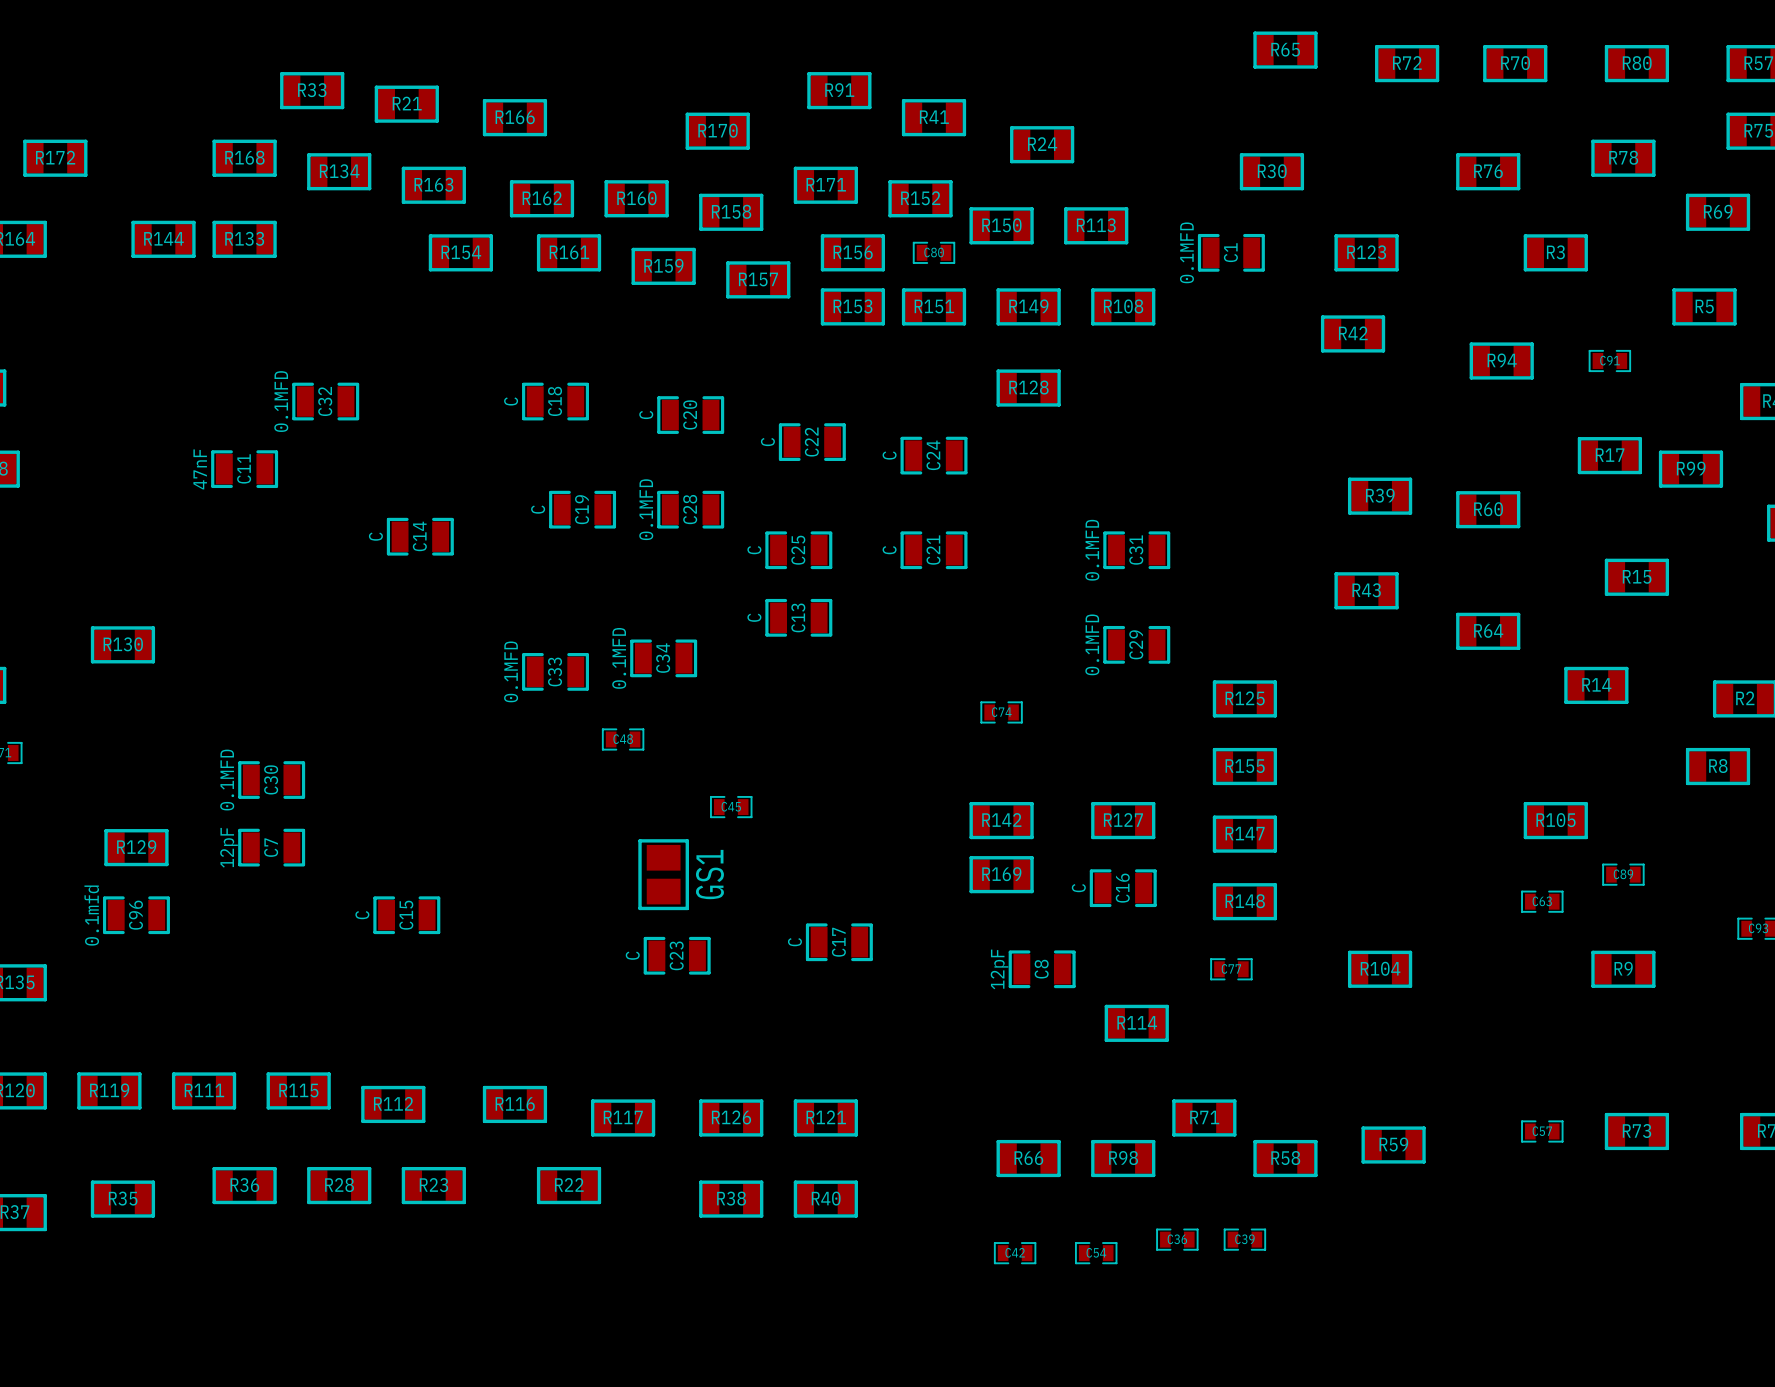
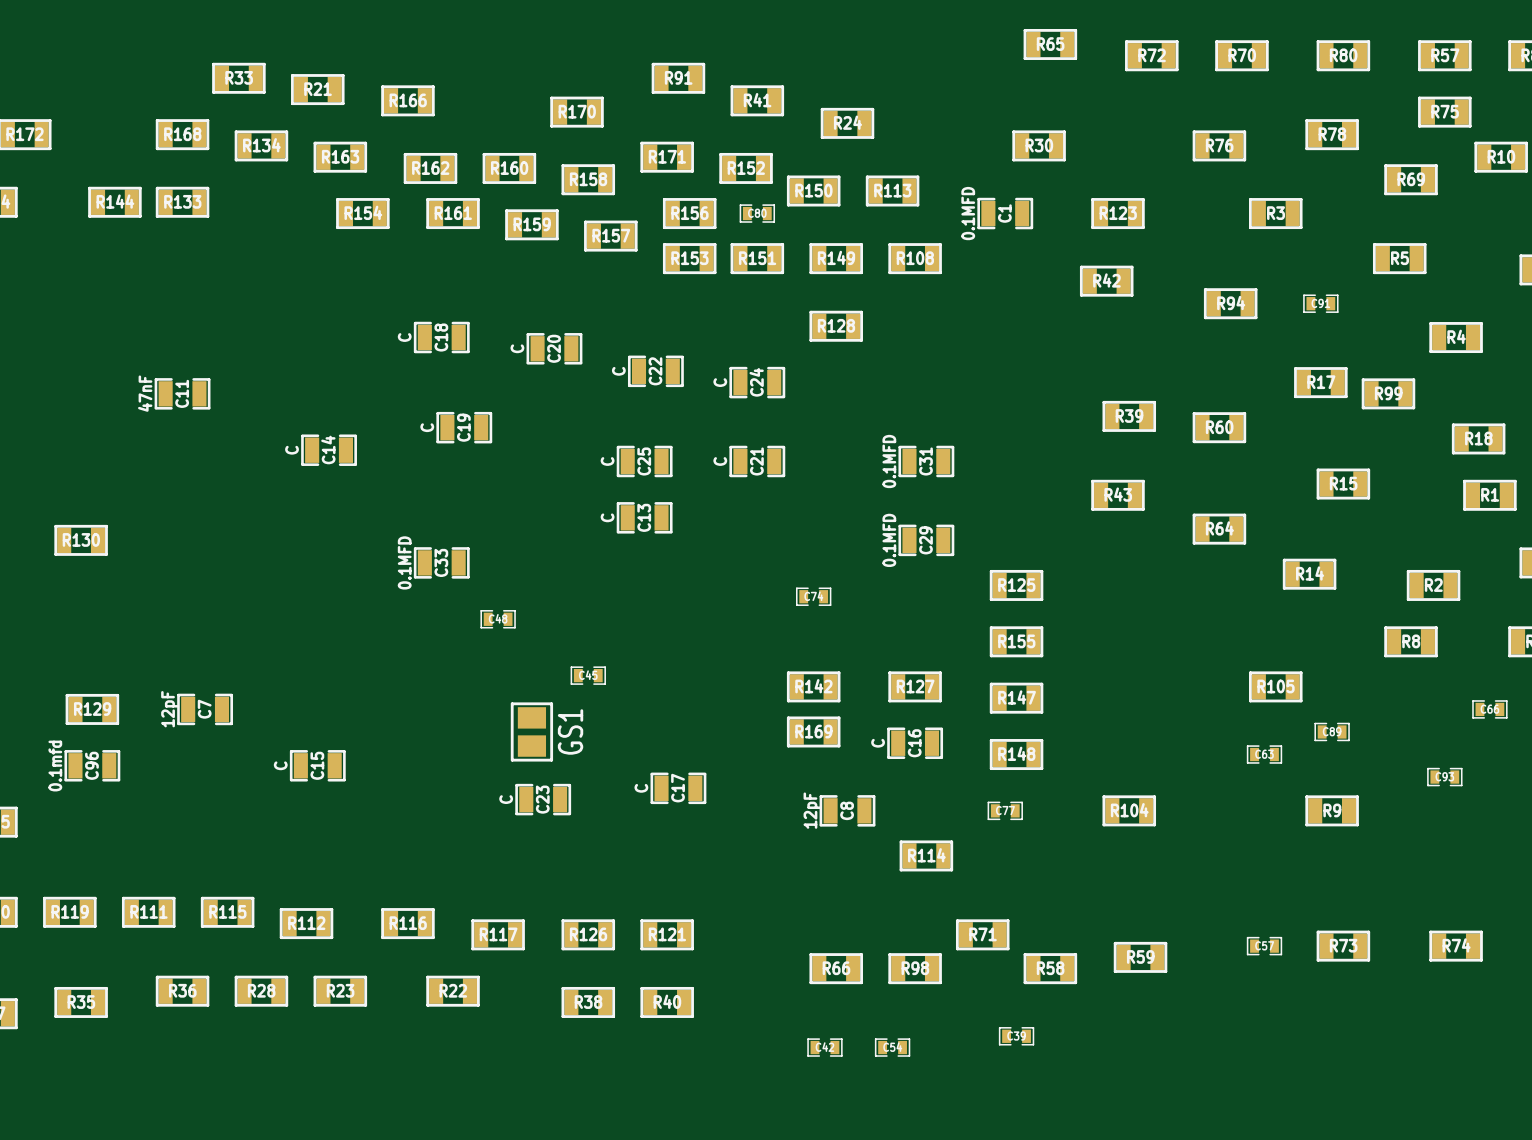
C32: 0.1MFD (325, 401) -> none
C28: 0.1MFD (690, 509) -> none
C34: 0.1MFD (663, 658) -> none
C30: 0.1MFD (271, 780) -> none
C36: (1177, 1239) -> none

